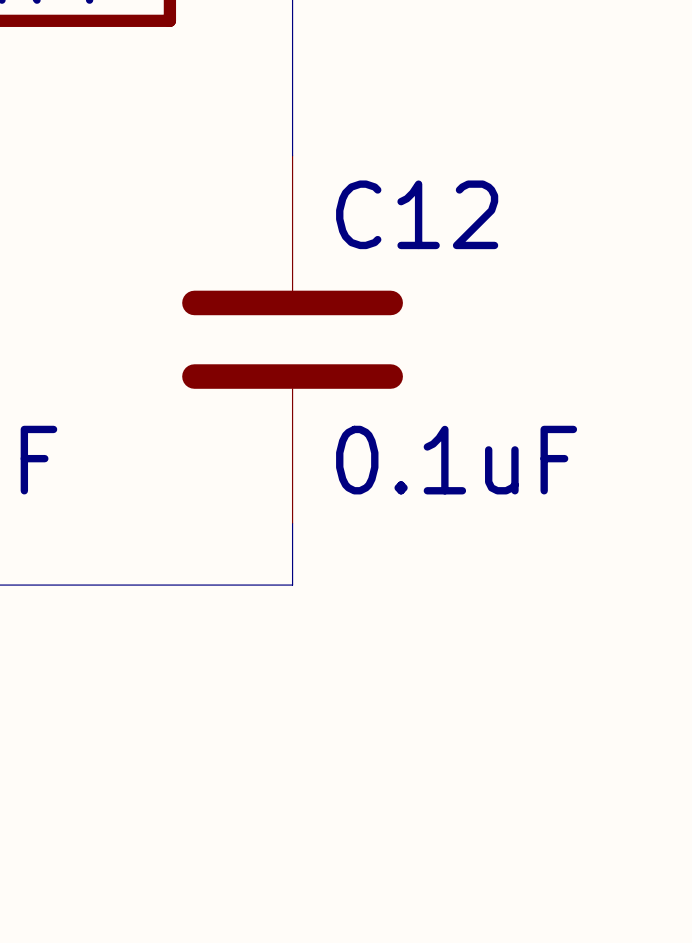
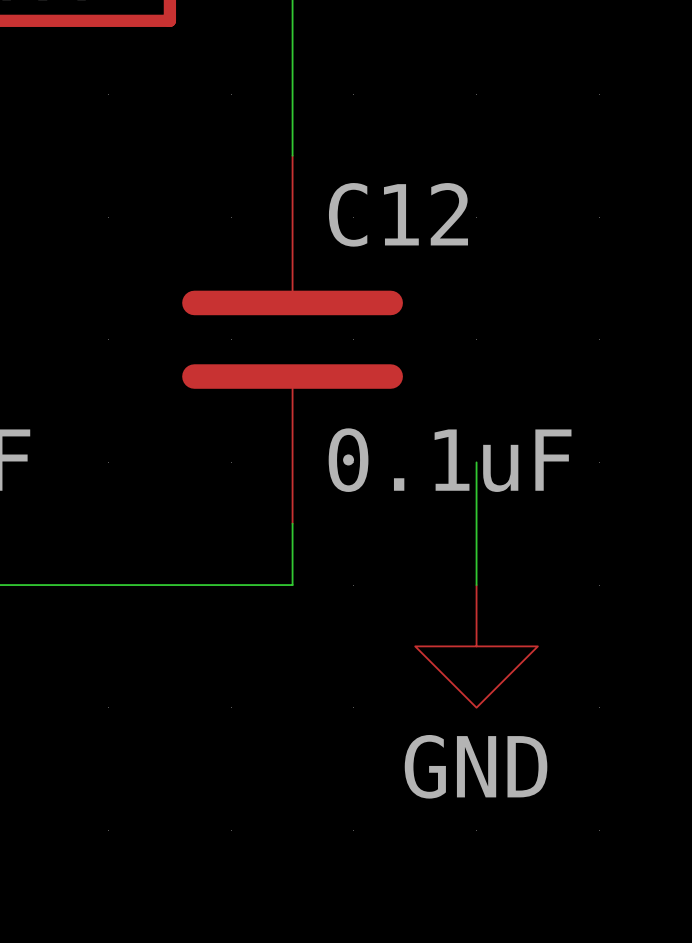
wire: none -> (476, 462) (476, 585)
power symbol: none -> GND (476, 646)

